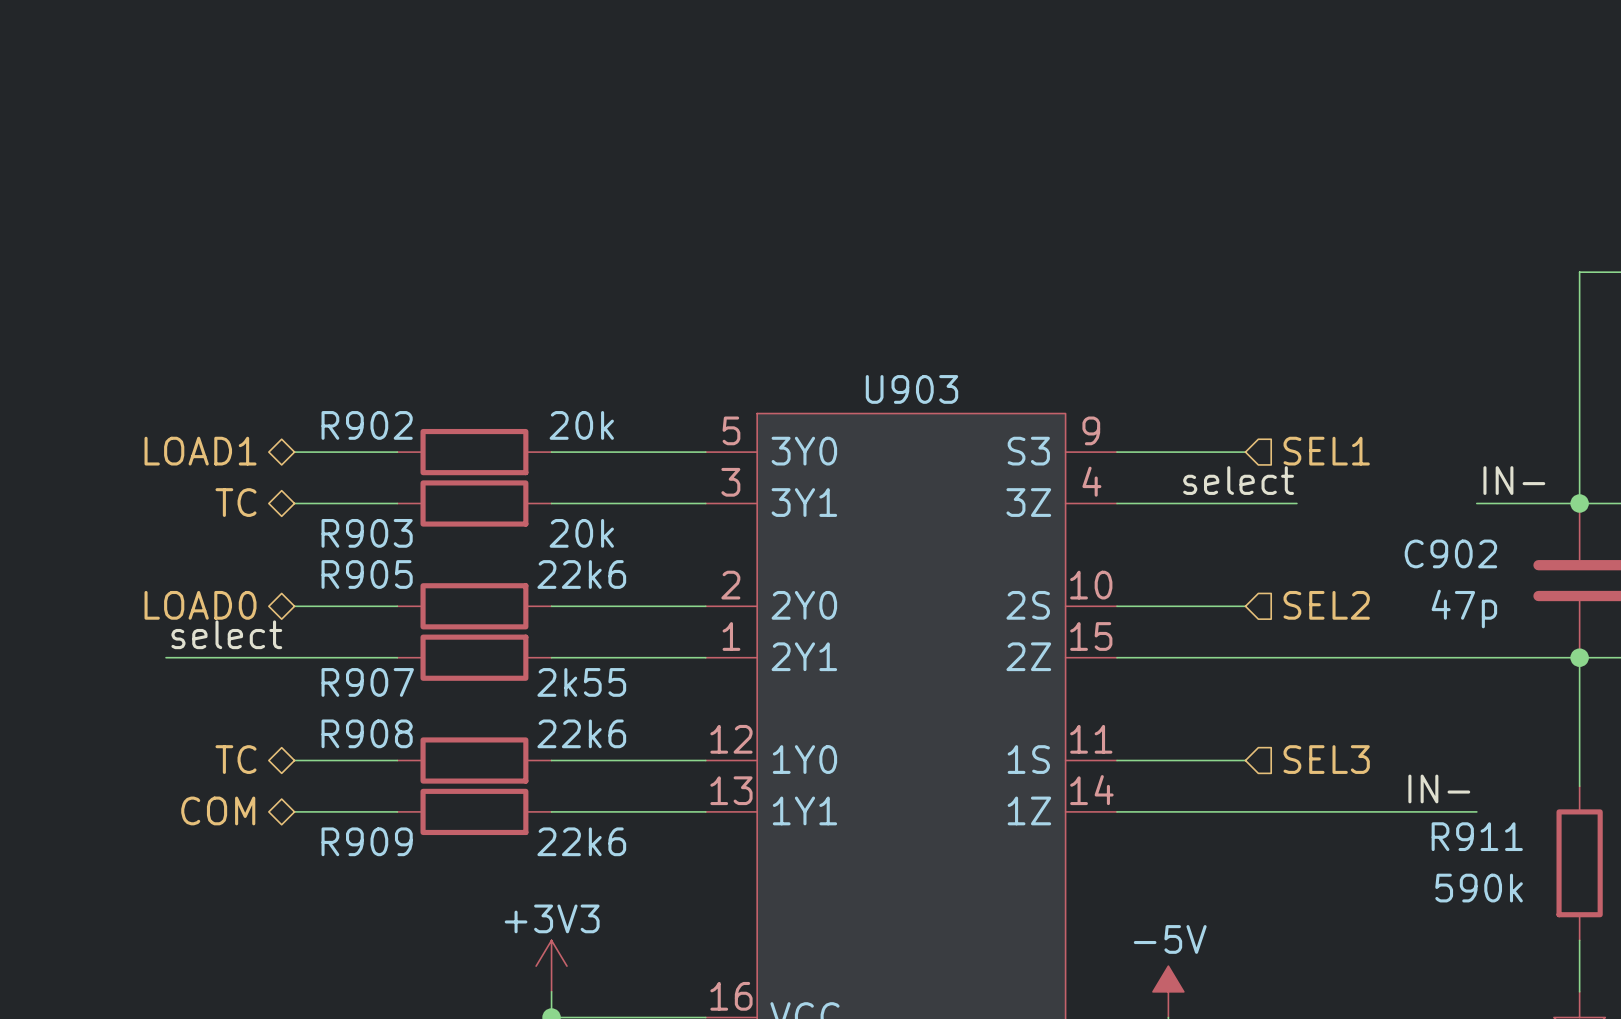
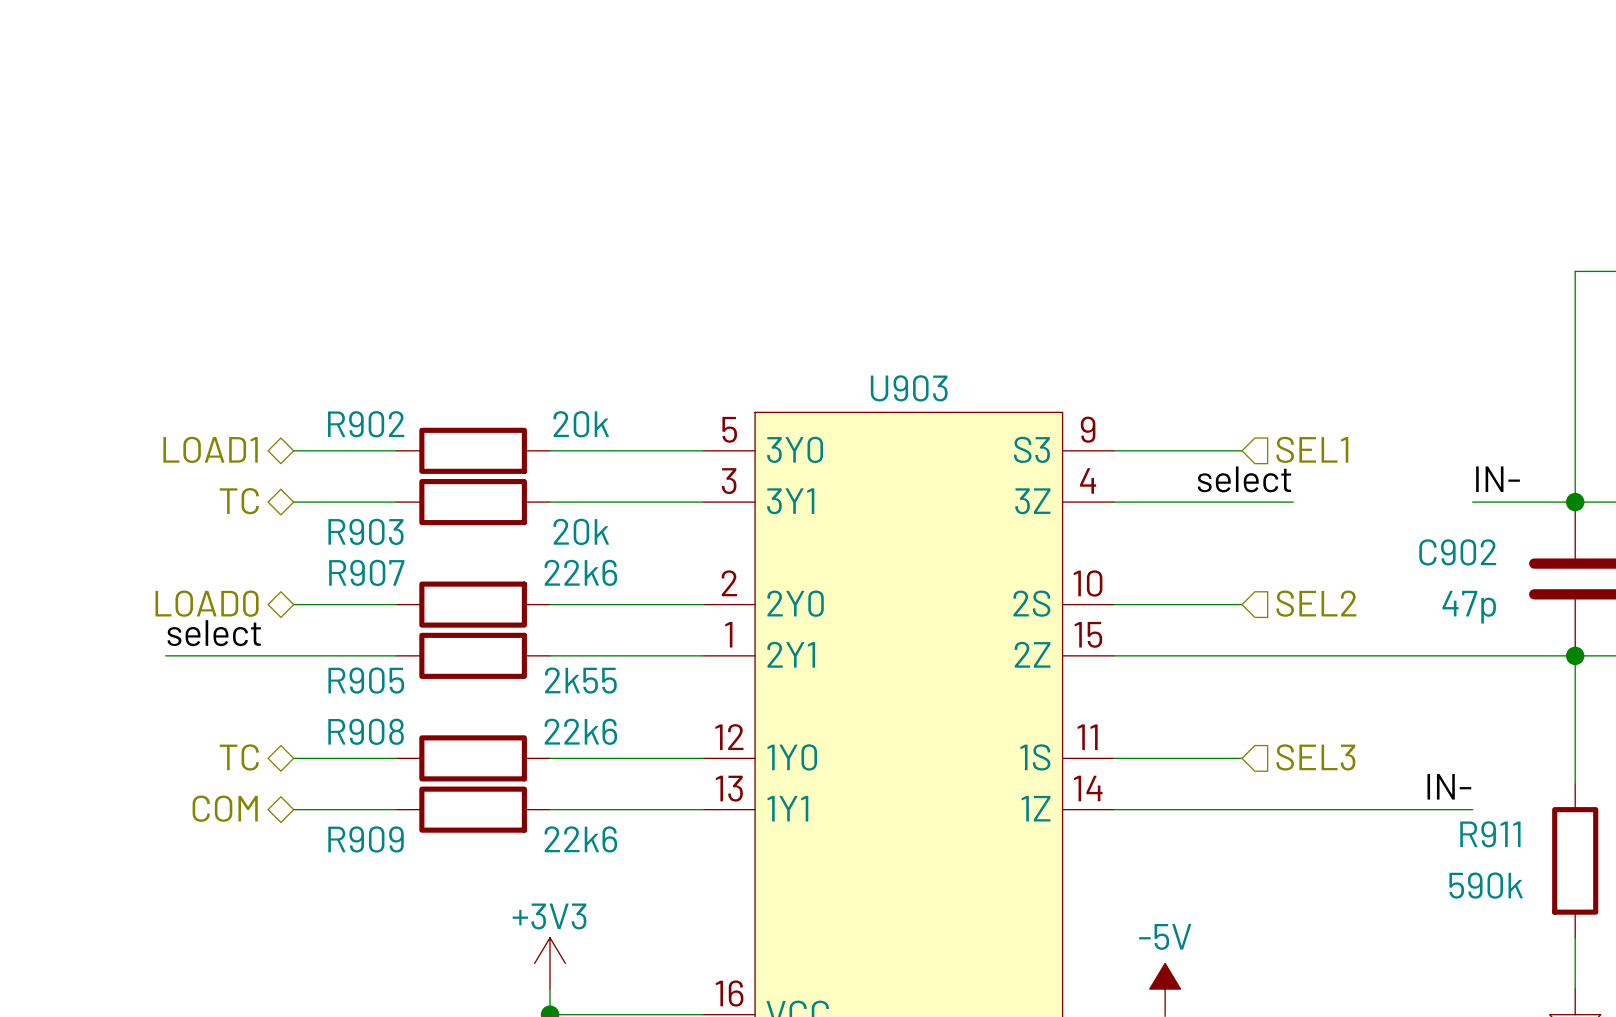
R905 name: R905 (367, 574) -> R907 (366, 572)
R907 name: R907 (367, 682) -> R905 (366, 680)

